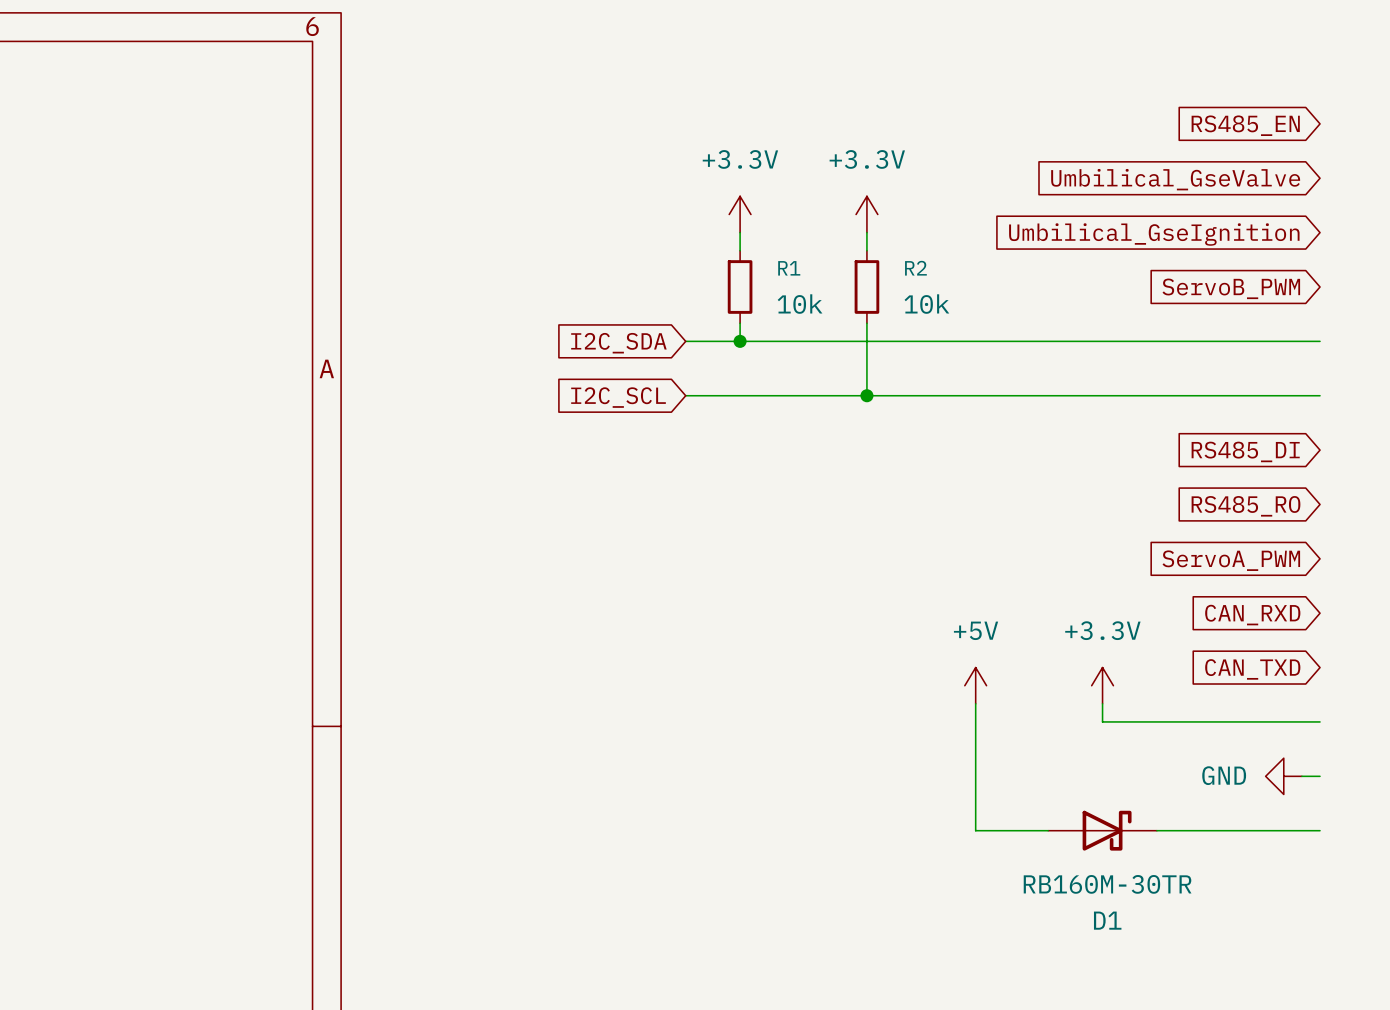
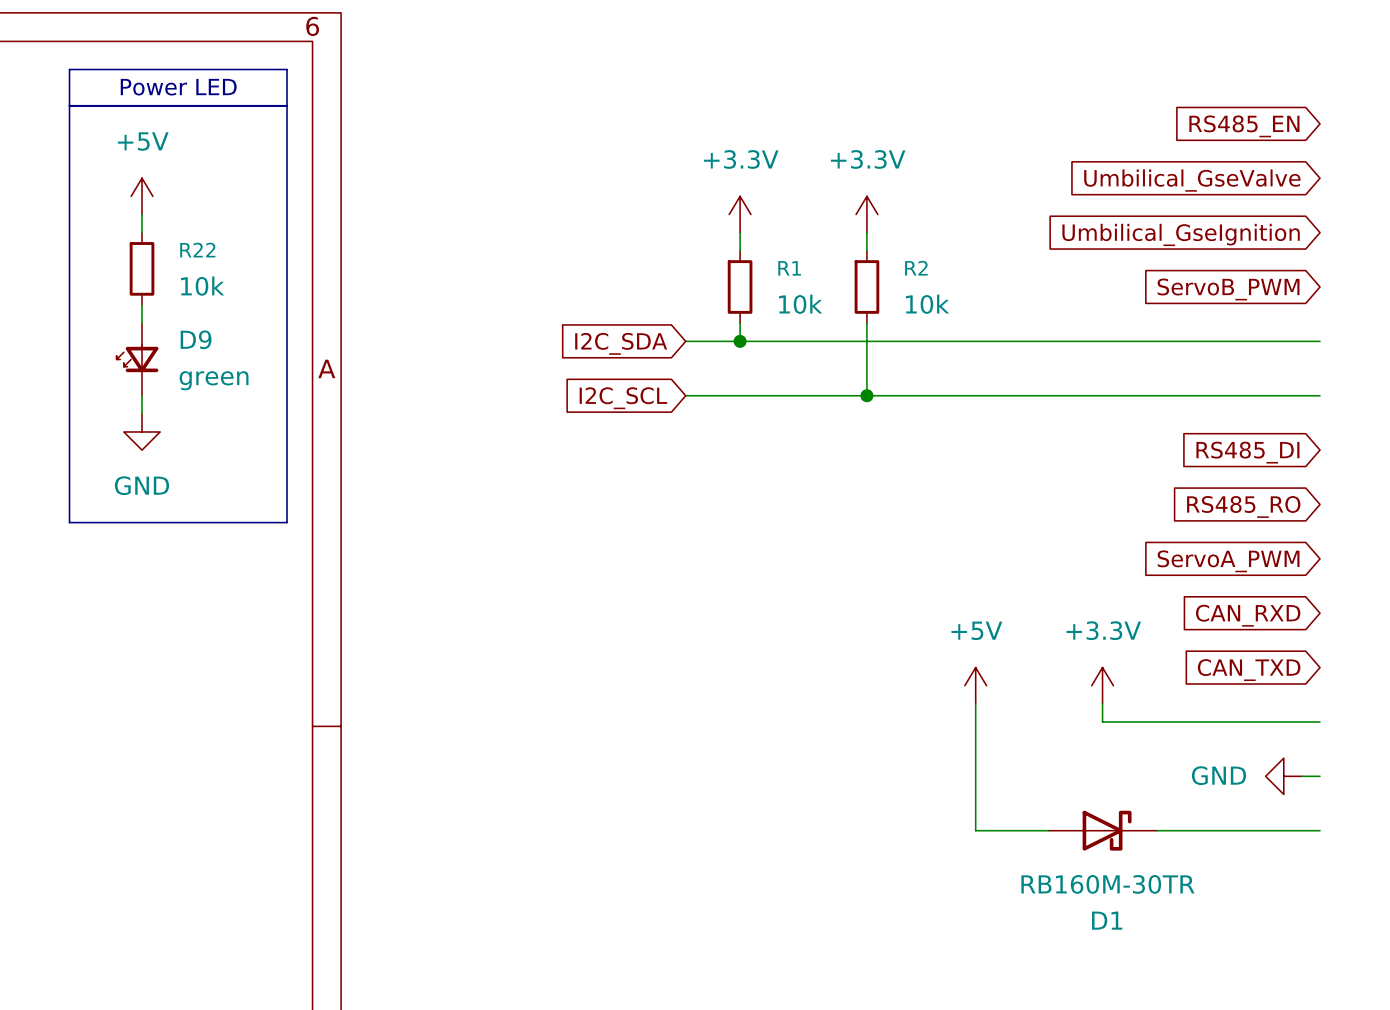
line: none -> (69, 69) (69, 522) (287, 522) (287, 69) (69, 69)
text: none -> Power LED (178, 87)
line: none -> (69, 105) (287, 105)
power symbol: none -> +5V (142, 196)
wire: none -> (142, 214) (142, 232)
R22: none -> 10k (142, 268)
wire: none -> (142, 305) (142, 323)
D9: none -> green (137, 359)
wire: none -> (142, 395) (142, 413)
power symbol: none -> GND (142, 431)

